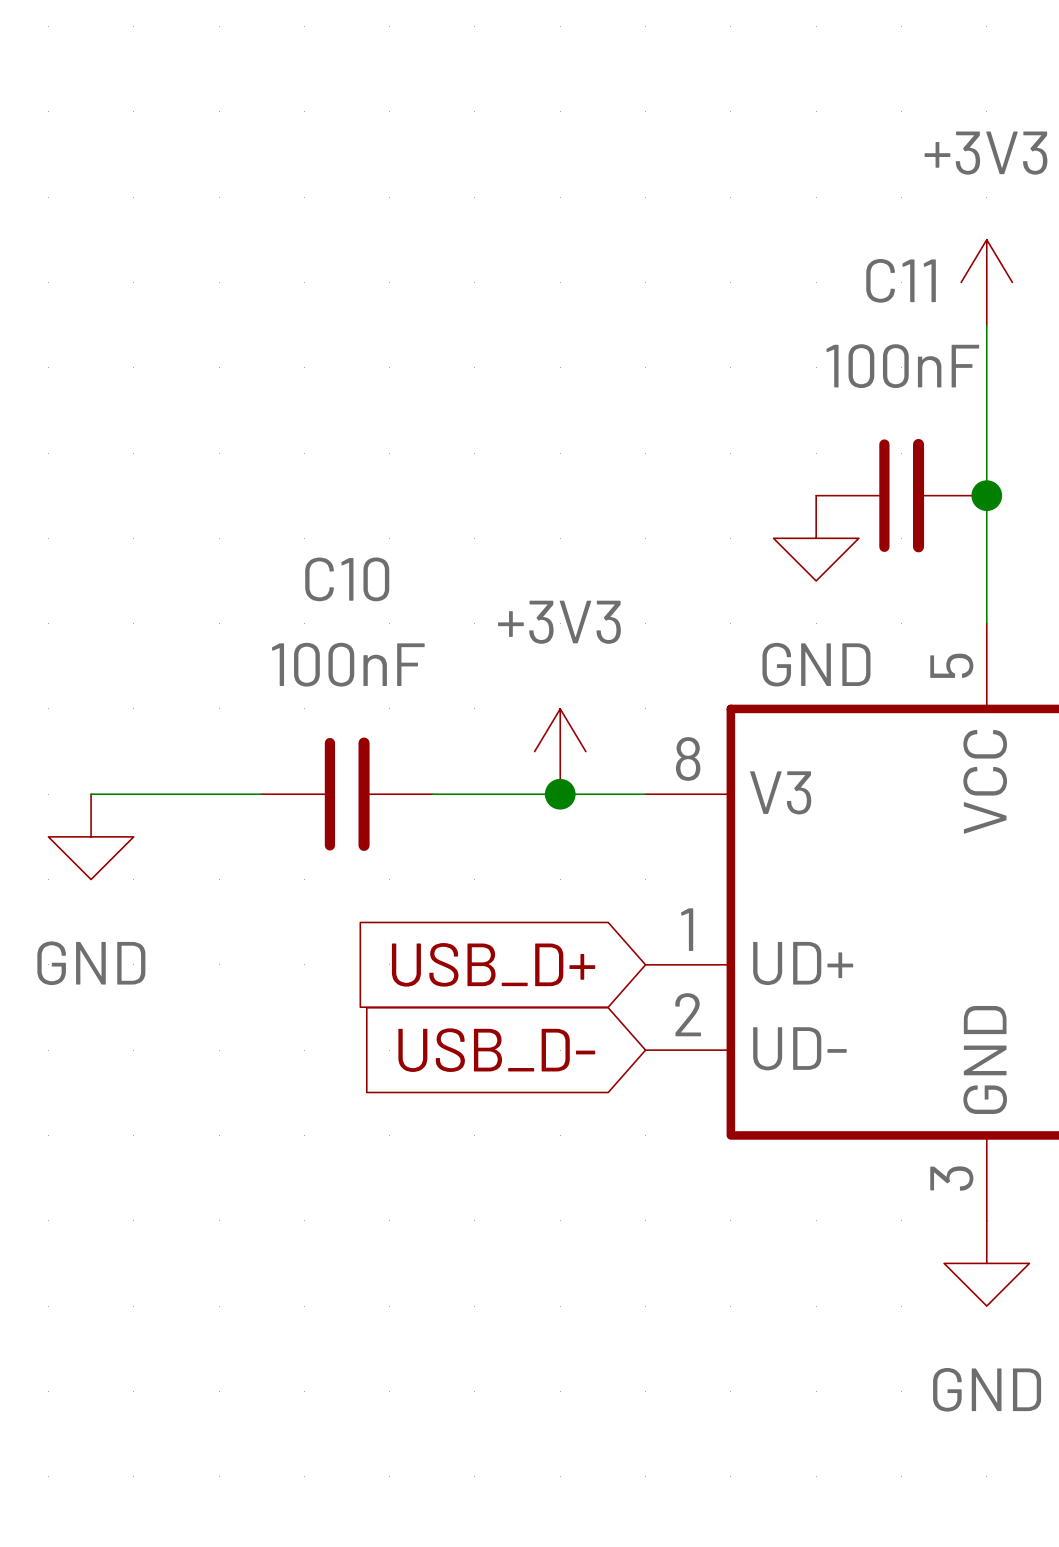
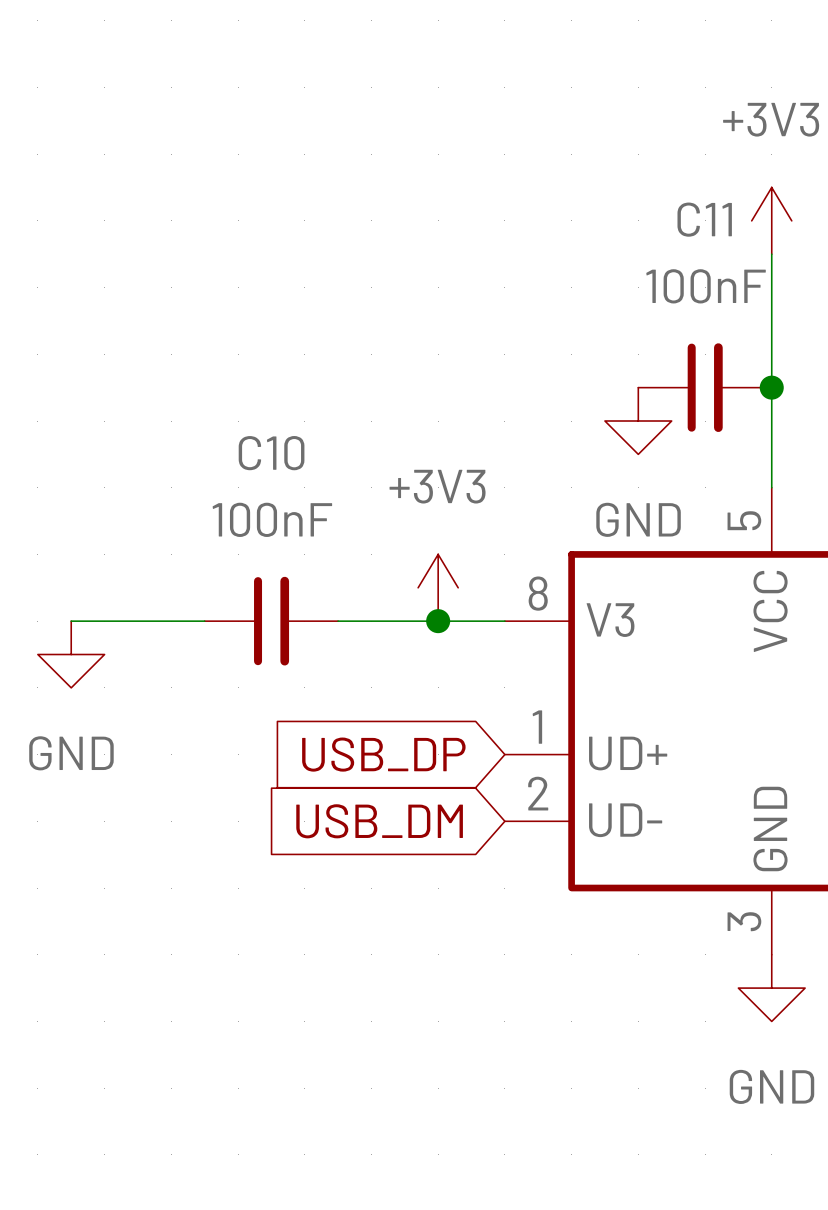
global label: USB_D+ (493, 964) -> USB_DP (383, 754)
global label: USB_D- (496, 1050) -> USB_DM (379, 821)

